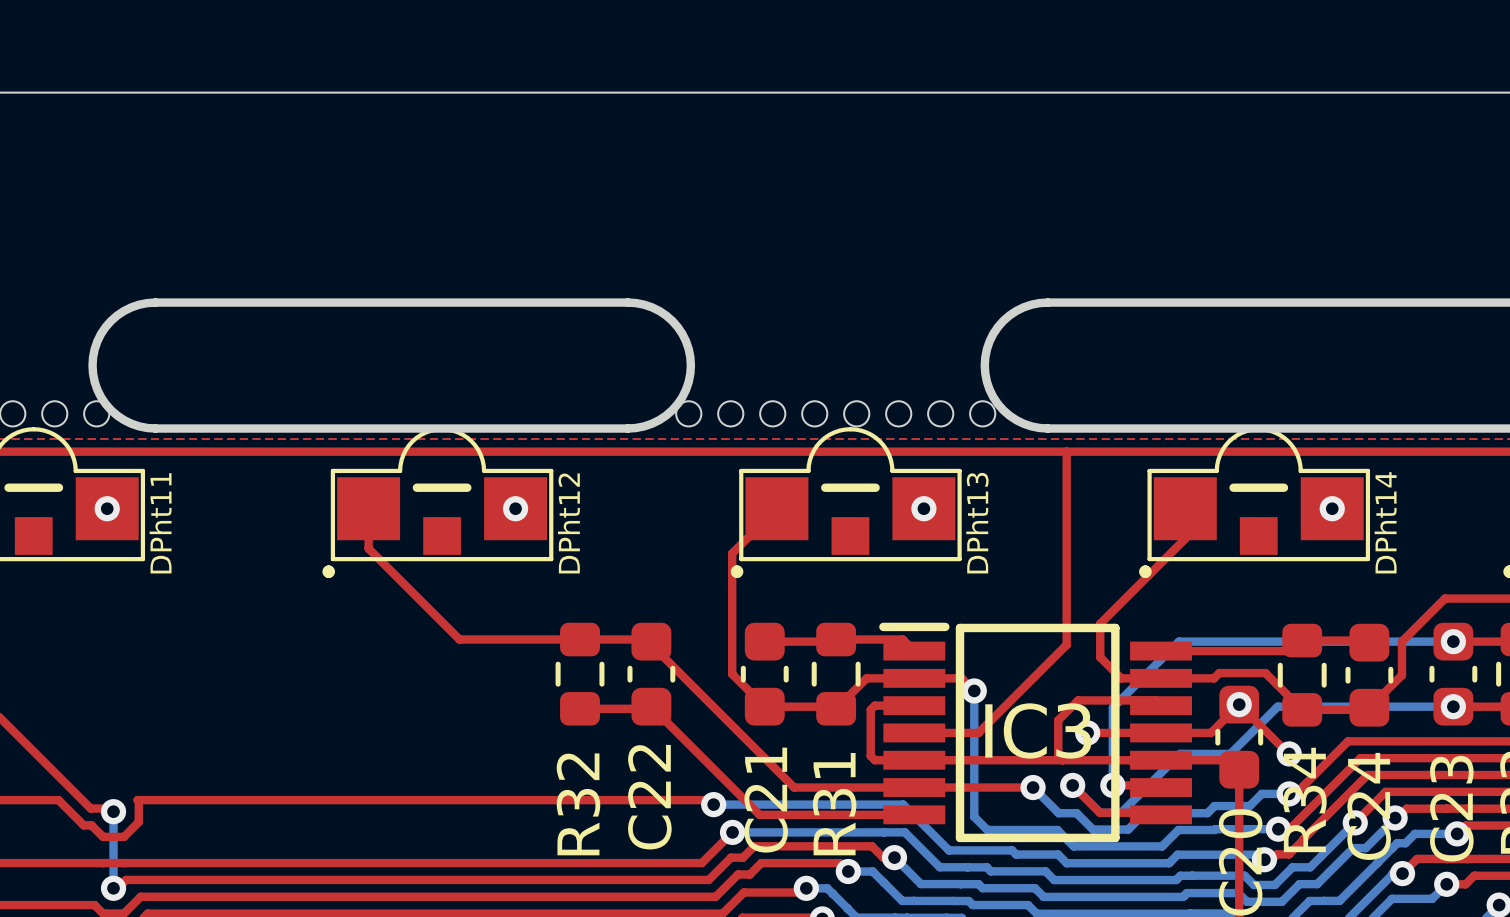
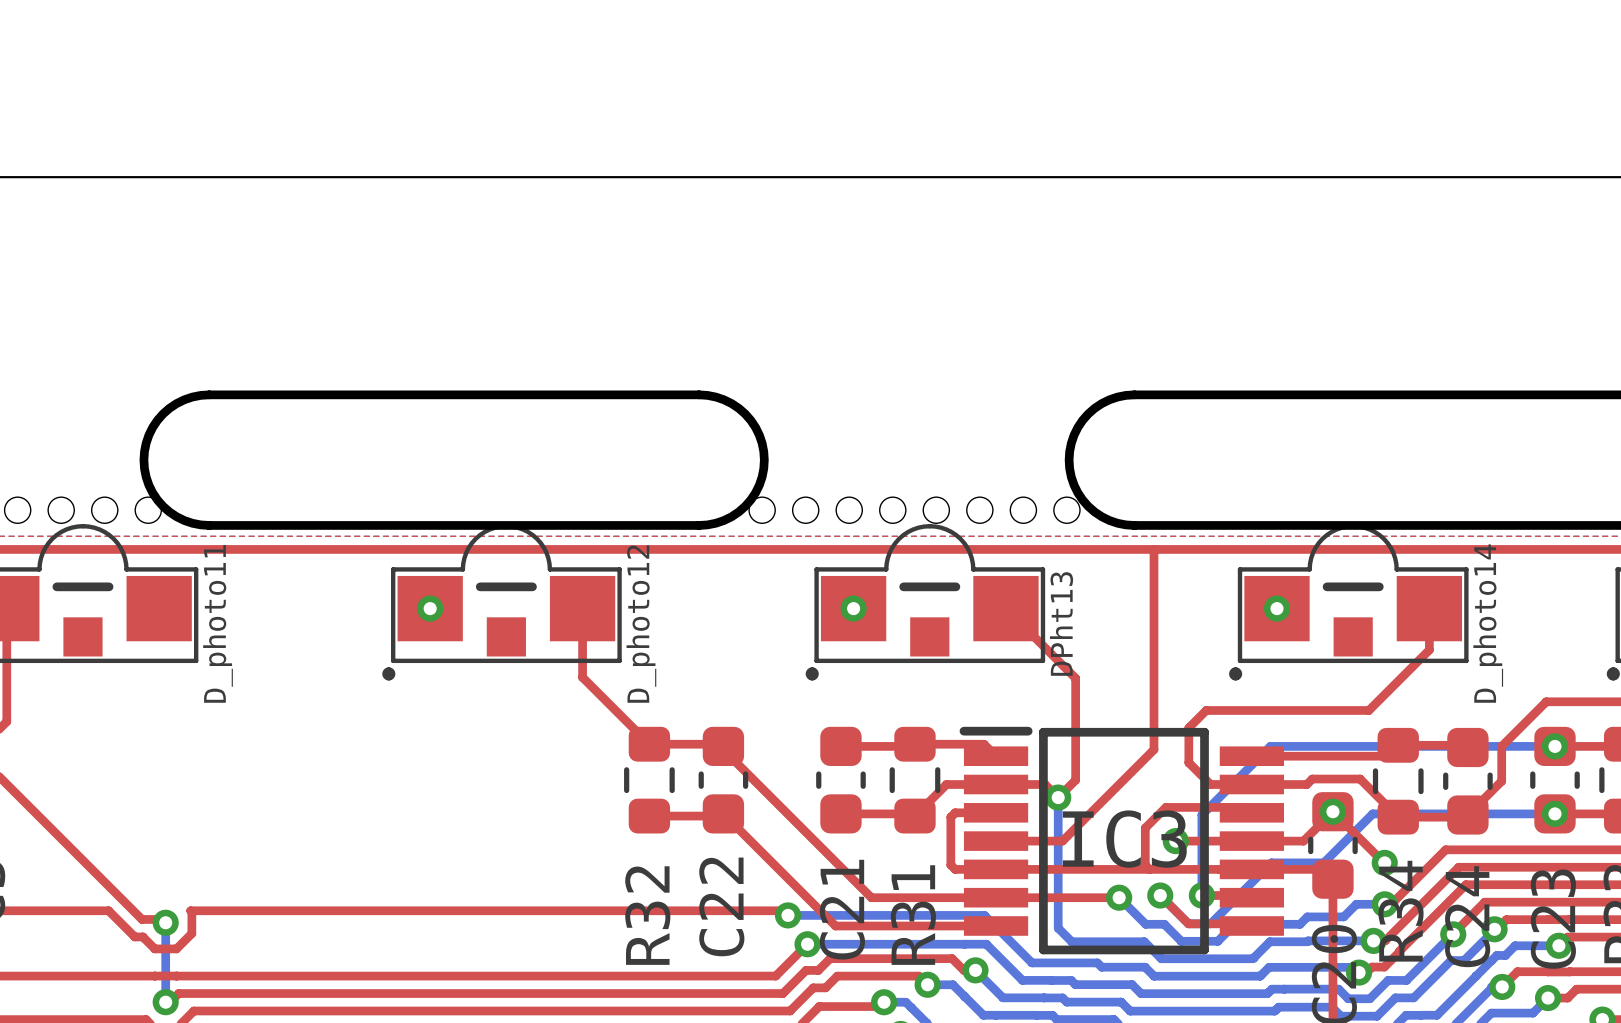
via: (107, 508) -> none
top track: (368, 508) (368, 548) (459, 639) (580, 639) -> (582, 608) (582, 677) (649, 744)
via: none -> (430, 608)
via: (515, 508) -> none
top track: (776, 508) (732, 553) (732, 674) (764, 706) -> none
via: none -> (853, 608)
top track: none -> (1005, 608) (1075, 678) (1075, 780) (1058, 797)
via: (923, 508) -> none
top track: (1185, 508) (1185, 538) (1117, 606) -> (1429, 608) (1429, 649) (1368, 710) (1206, 710)
via: none -> (1276, 608)
via: (1332, 508) -> none
DPht14 name: DPht14 (1385, 522) -> D_photo14 (1488, 623)
DPht11 name: DPht11 (160, 523) -> D_photo11 (218, 623)
DPht12 name: DPht12 (568, 523) -> D_photo12 (641, 624)

